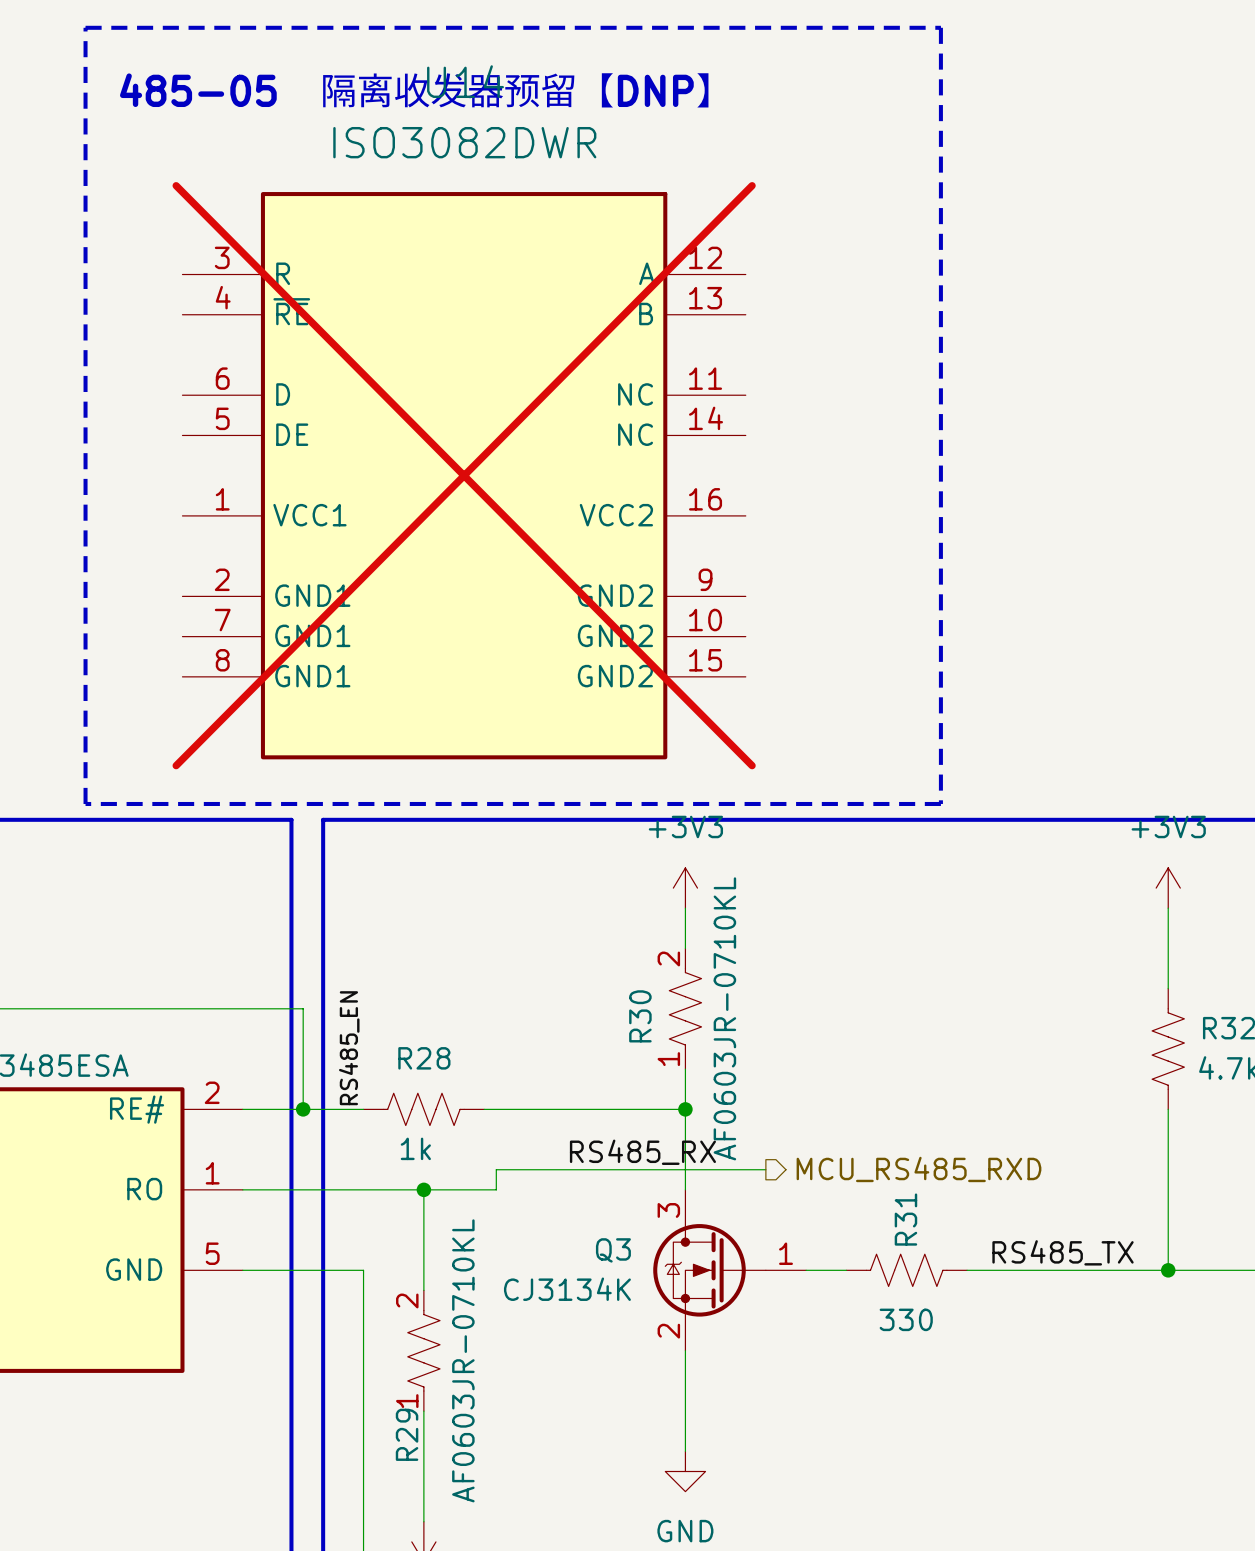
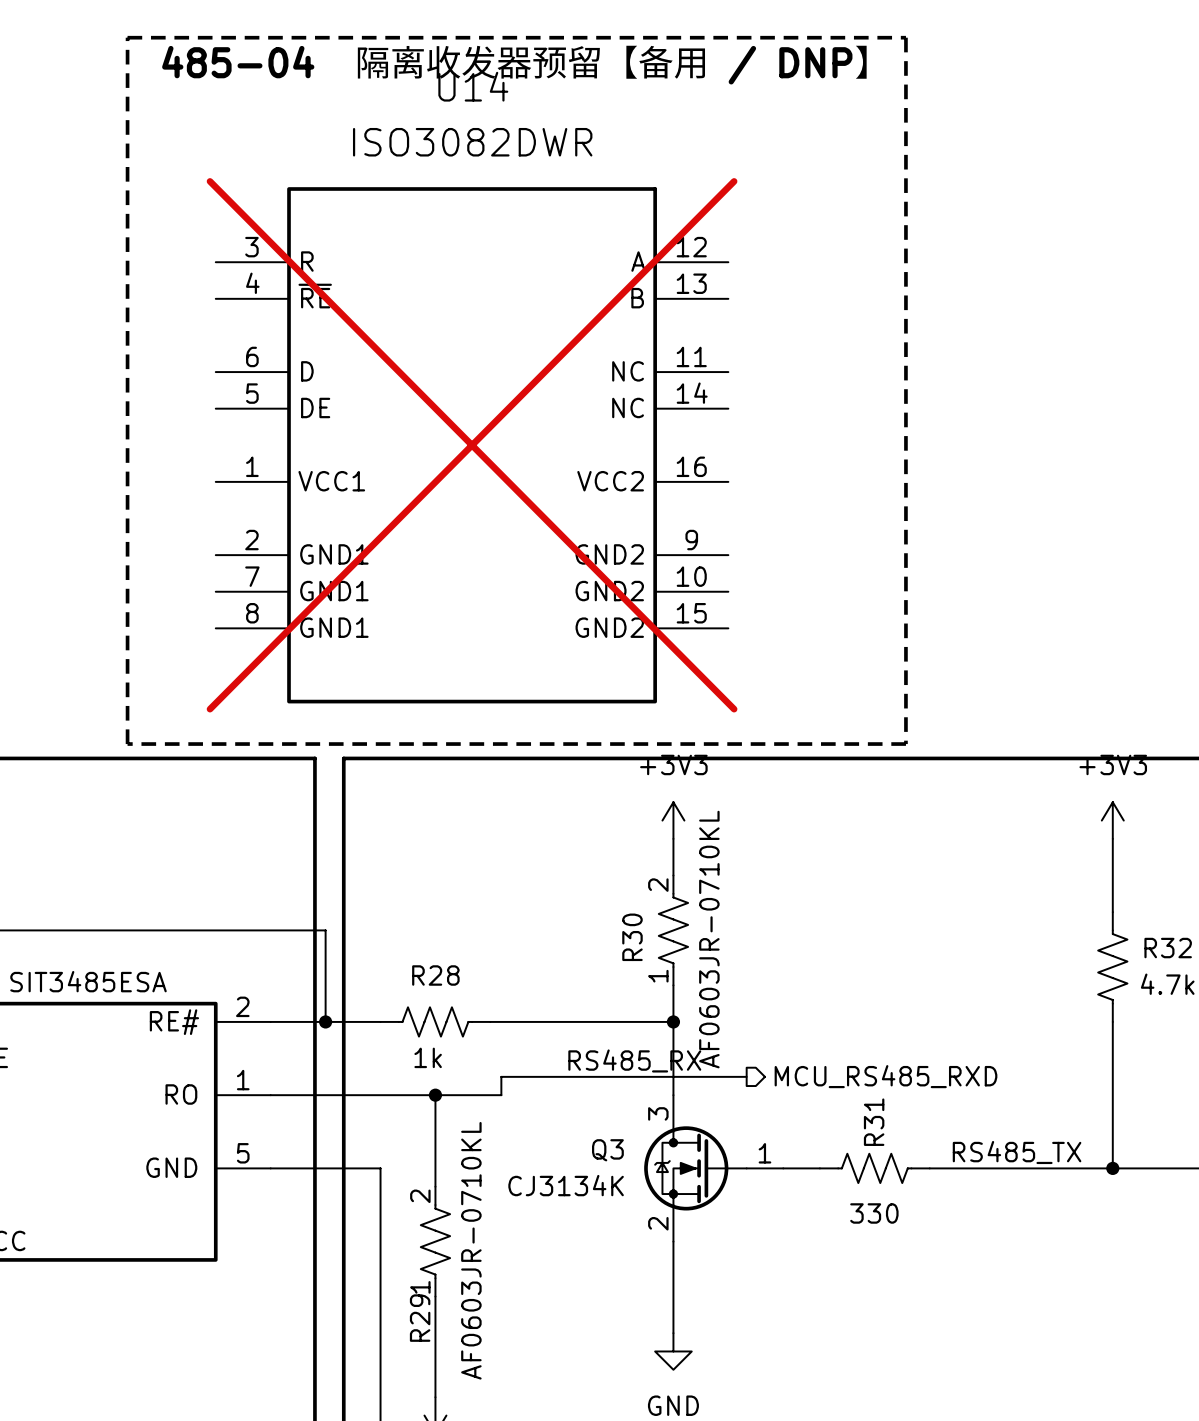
text: 485-05 隔离收发器预留【DNP】 (415, 90) -> 485-04 隔离收发器预留【备用 / DNP】 (515, 63)
label: RS485_EN (349, 1048) -> none

